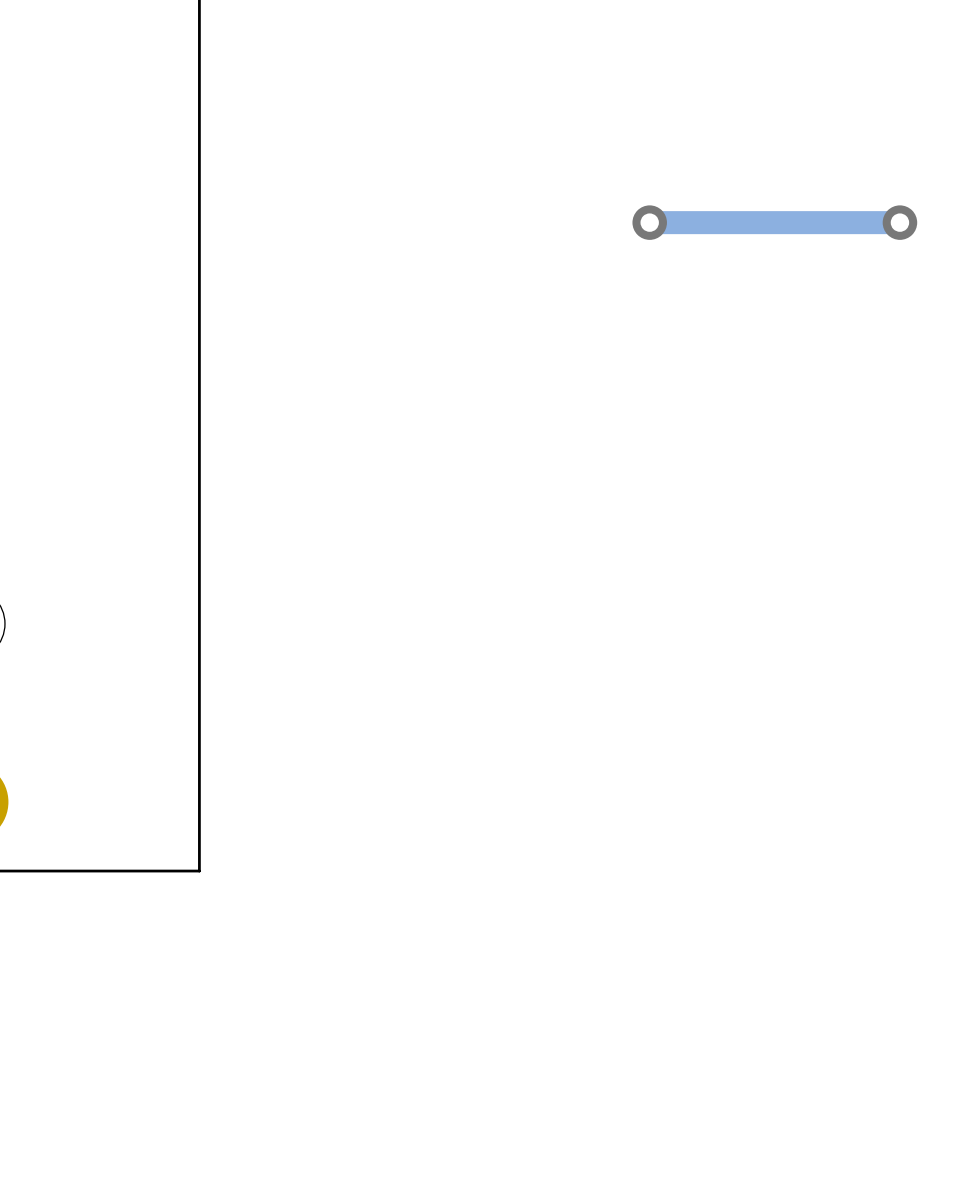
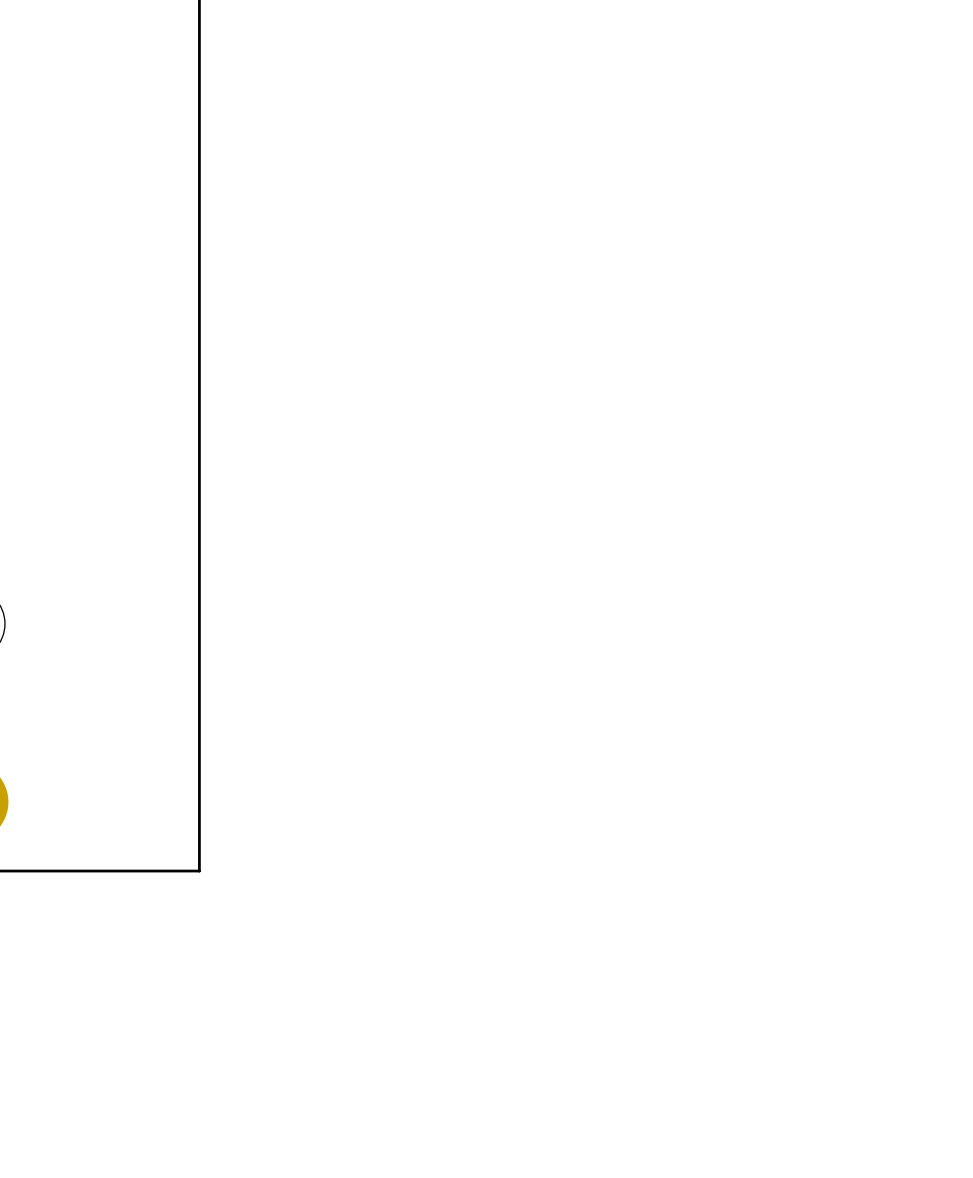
via: (649, 222) -> none
track: (899, 222) (649, 222) -> none
via: (899, 222) -> none

